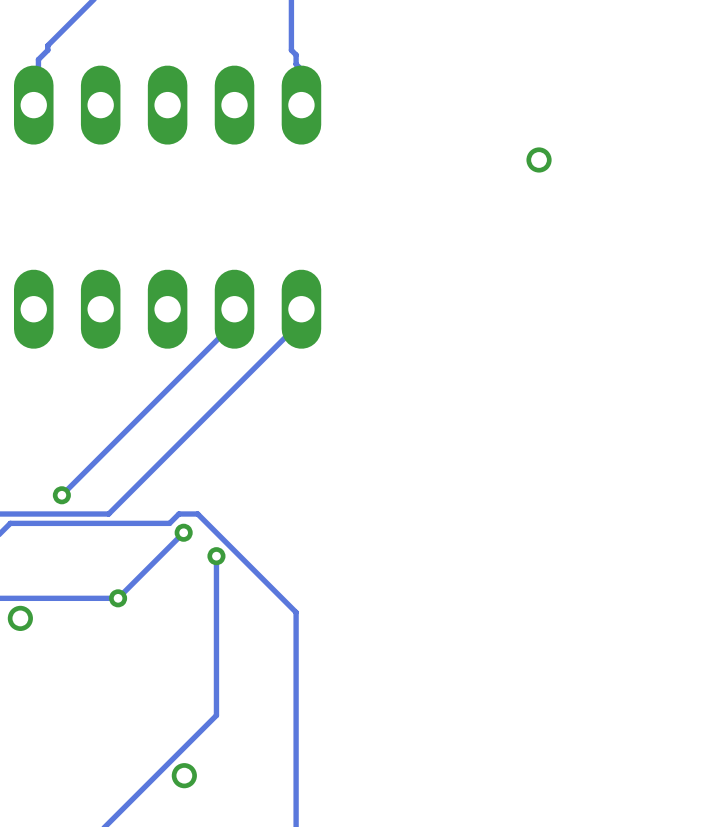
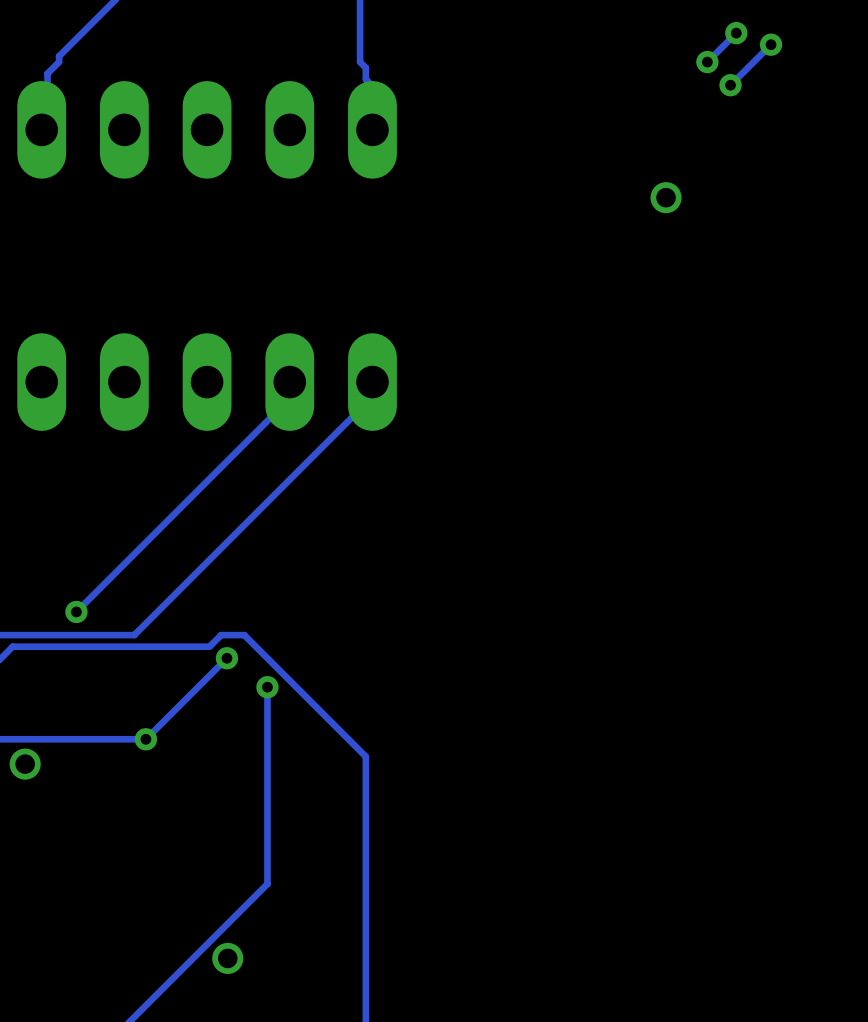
track: none -> (736, 33) (707, 62)
via: none -> (736, 33)
track: none -> (771, 44) (730, 85)
via: none -> (771, 44)
via: none -> (707, 62)
via: none -> (730, 85)

